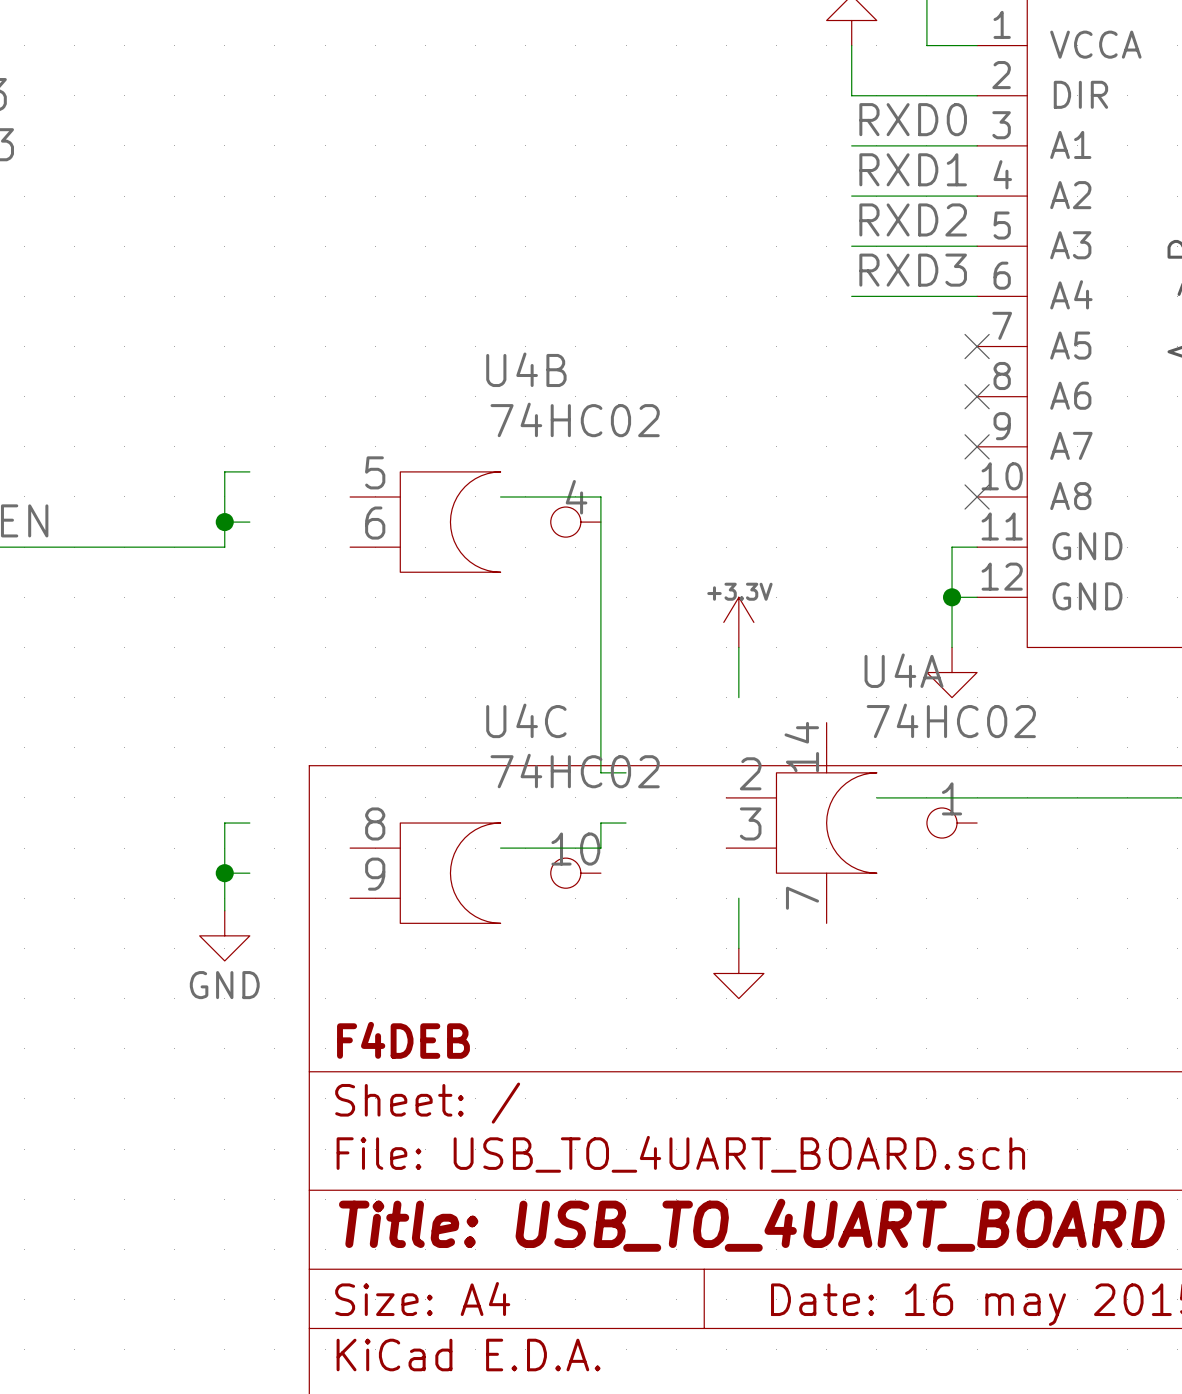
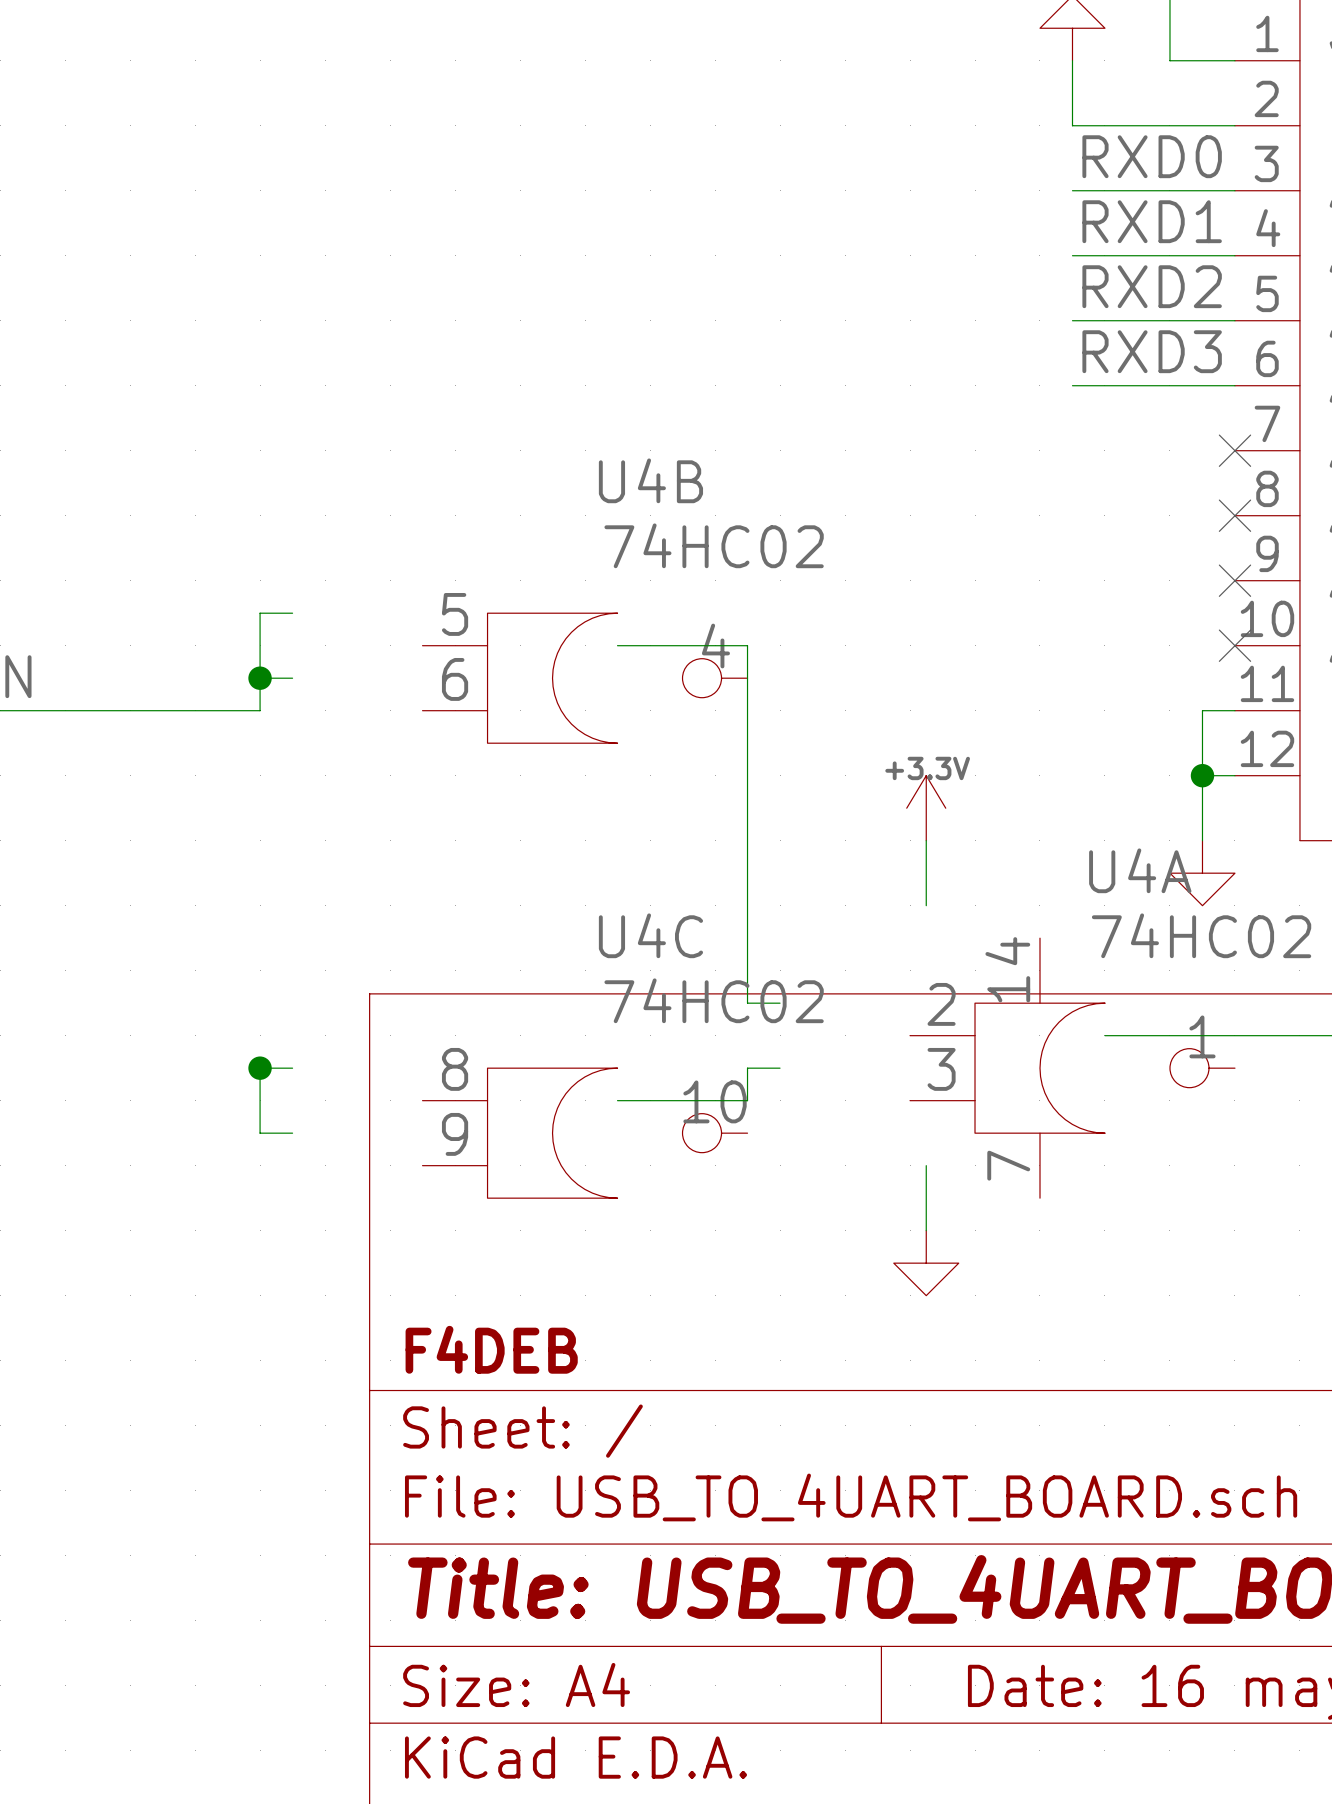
wire: (224, 873) (224, 910) -> none
junction position: (224, 873) -> (260, 1068)
power symbol: GND (224, 935) -> none

